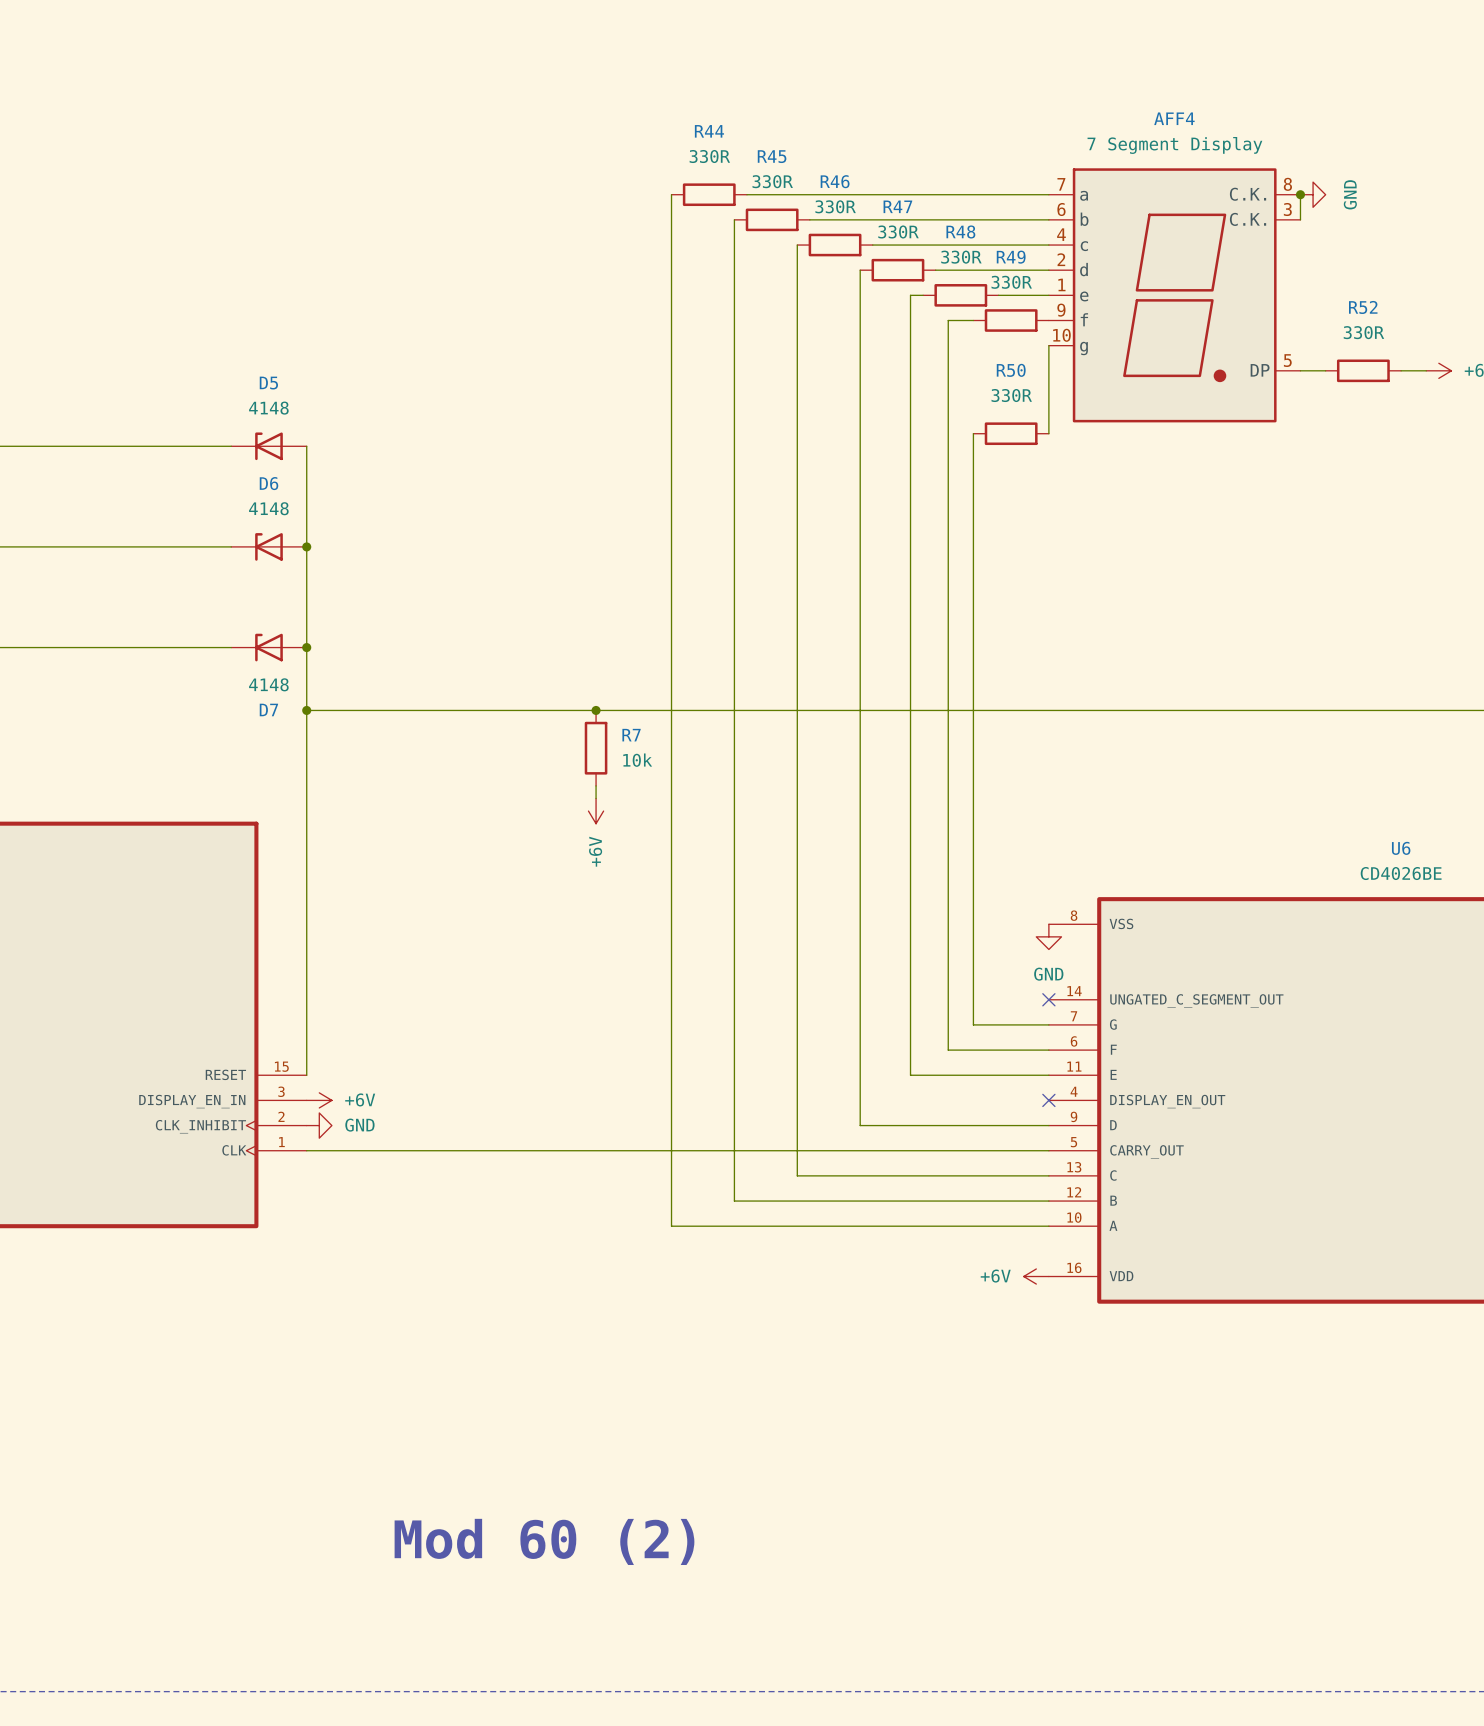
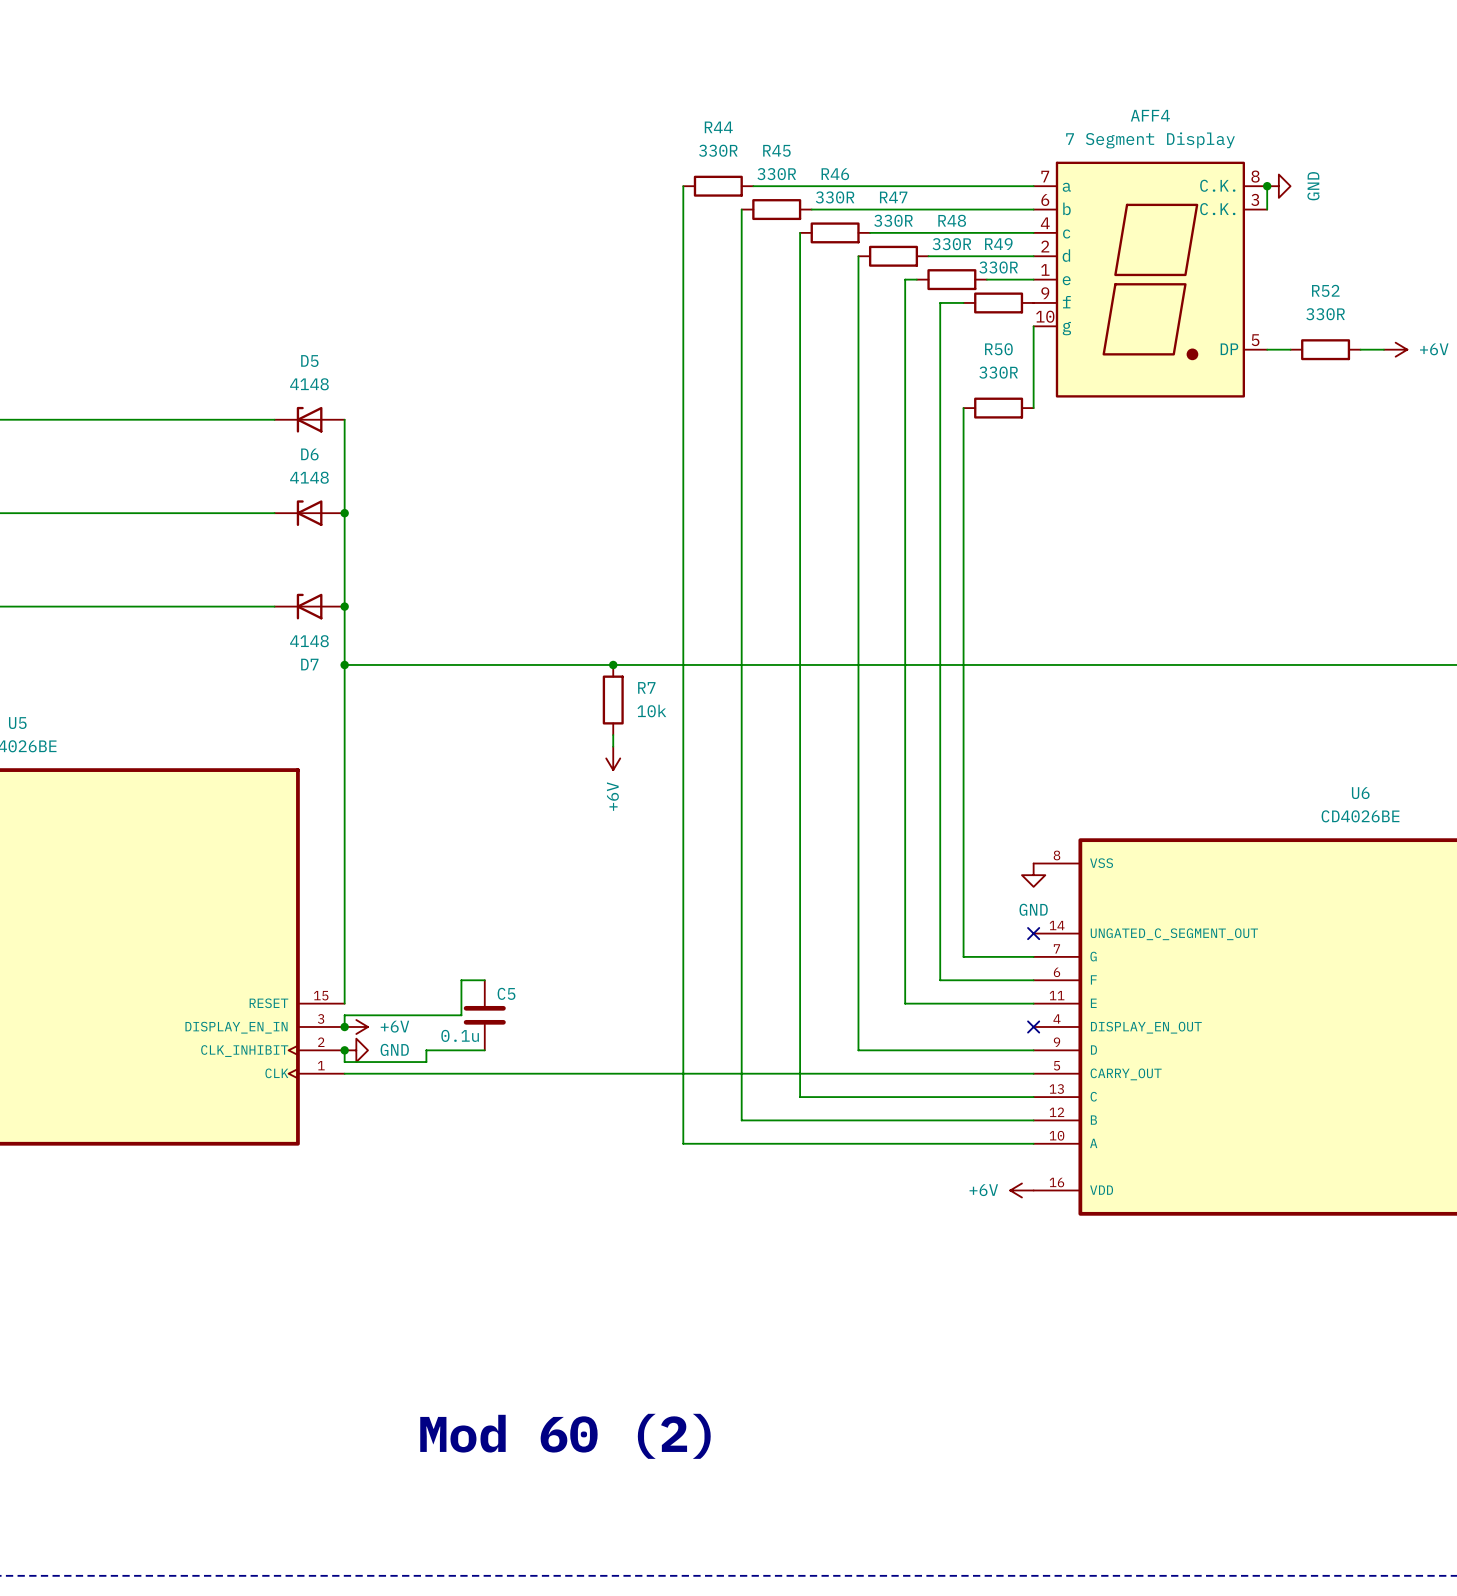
wire: none -> (484, 980) (461, 980) (461, 1015) (344, 1015) (344, 1026)
C5: none -> 0.1u (484, 1015)
junction: none -> (344, 1026)
wire: none -> (344, 1050) (344, 1062) (426, 1062) (426, 1050) (484, 1050)
junction: none -> (344, 1050)

